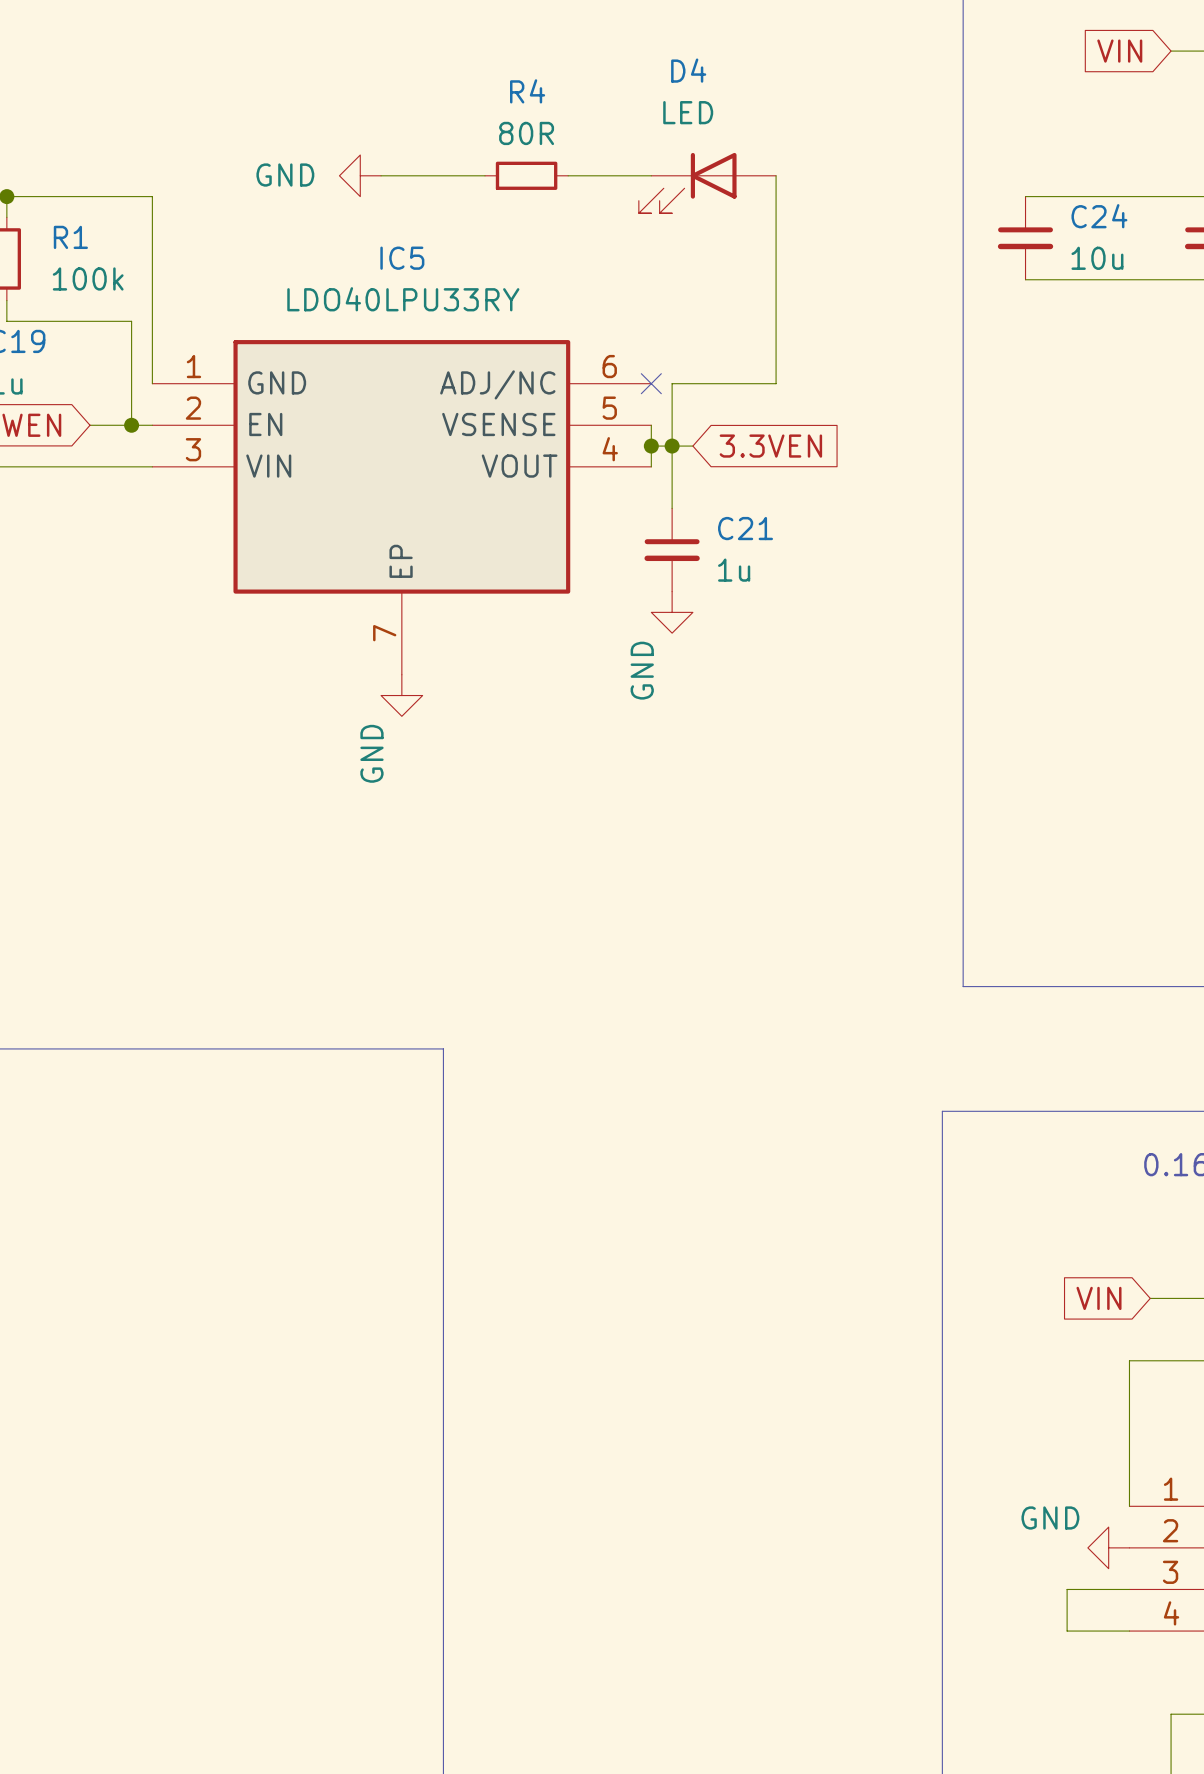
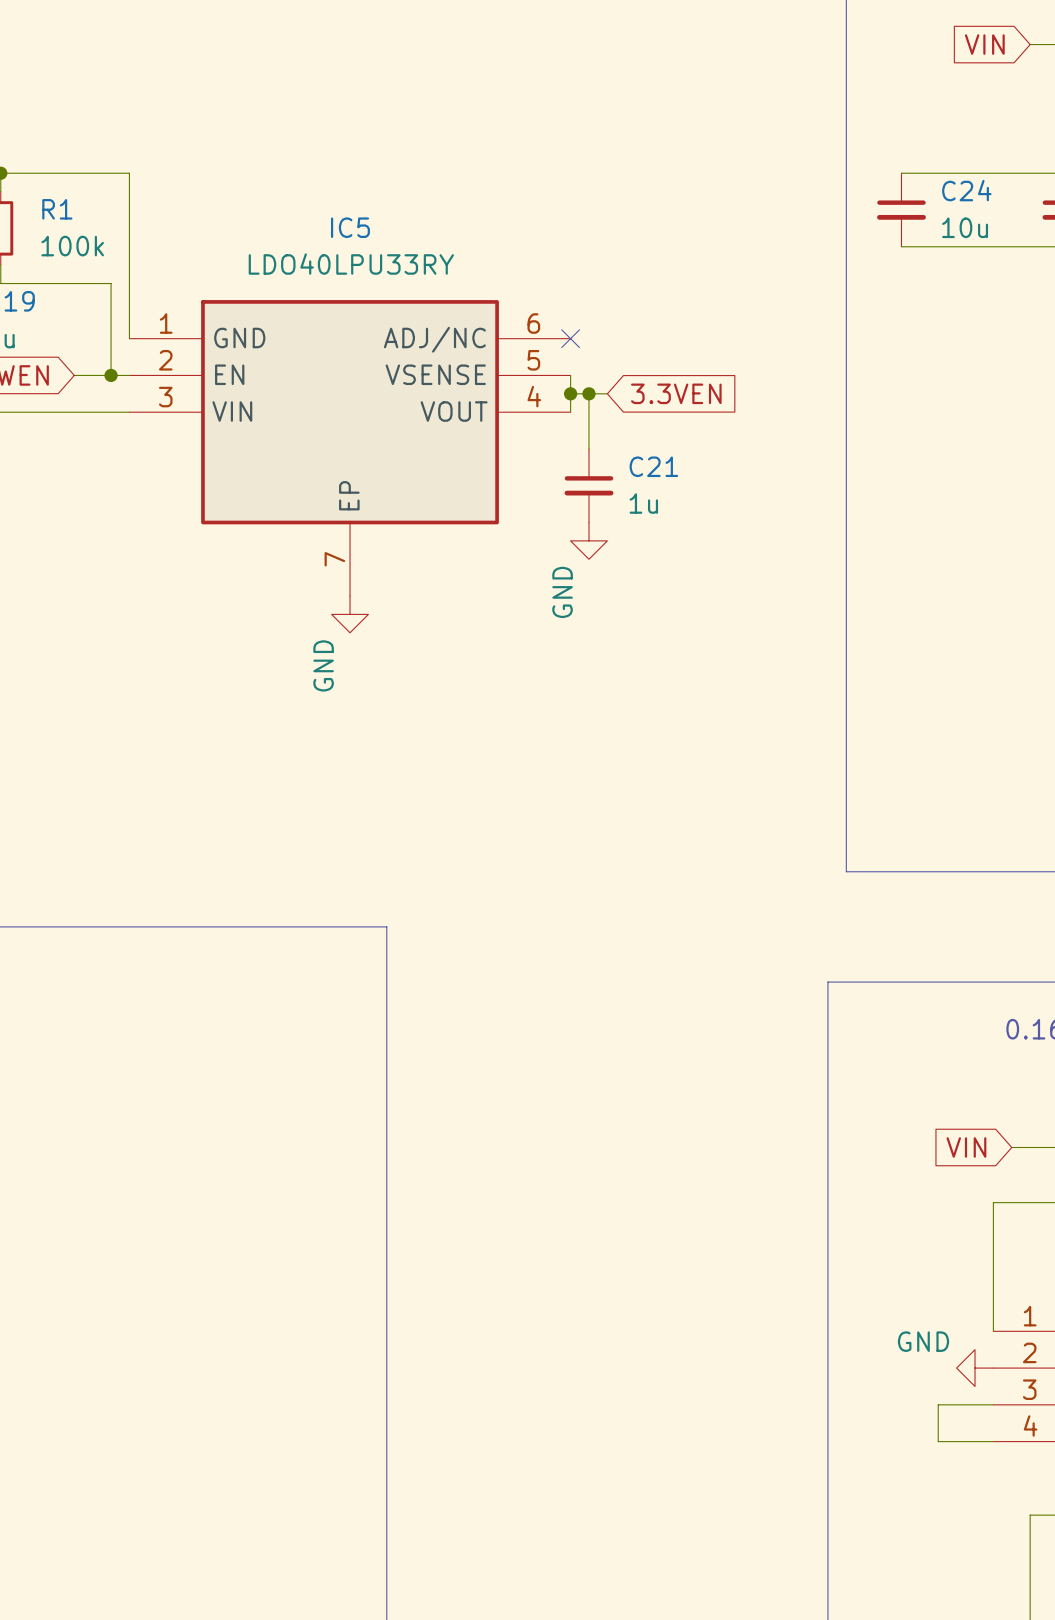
power symbol: GND (360, 175) -> none
wire: (381, 175) (485, 175) -> none
R4: 80R (526, 175) -> none
wire: (568, 175) (651, 175) -> none
wire: (776, 175) (776, 383) (672, 383) (672, 446) -> none
D4: LED (707, 183) -> none

